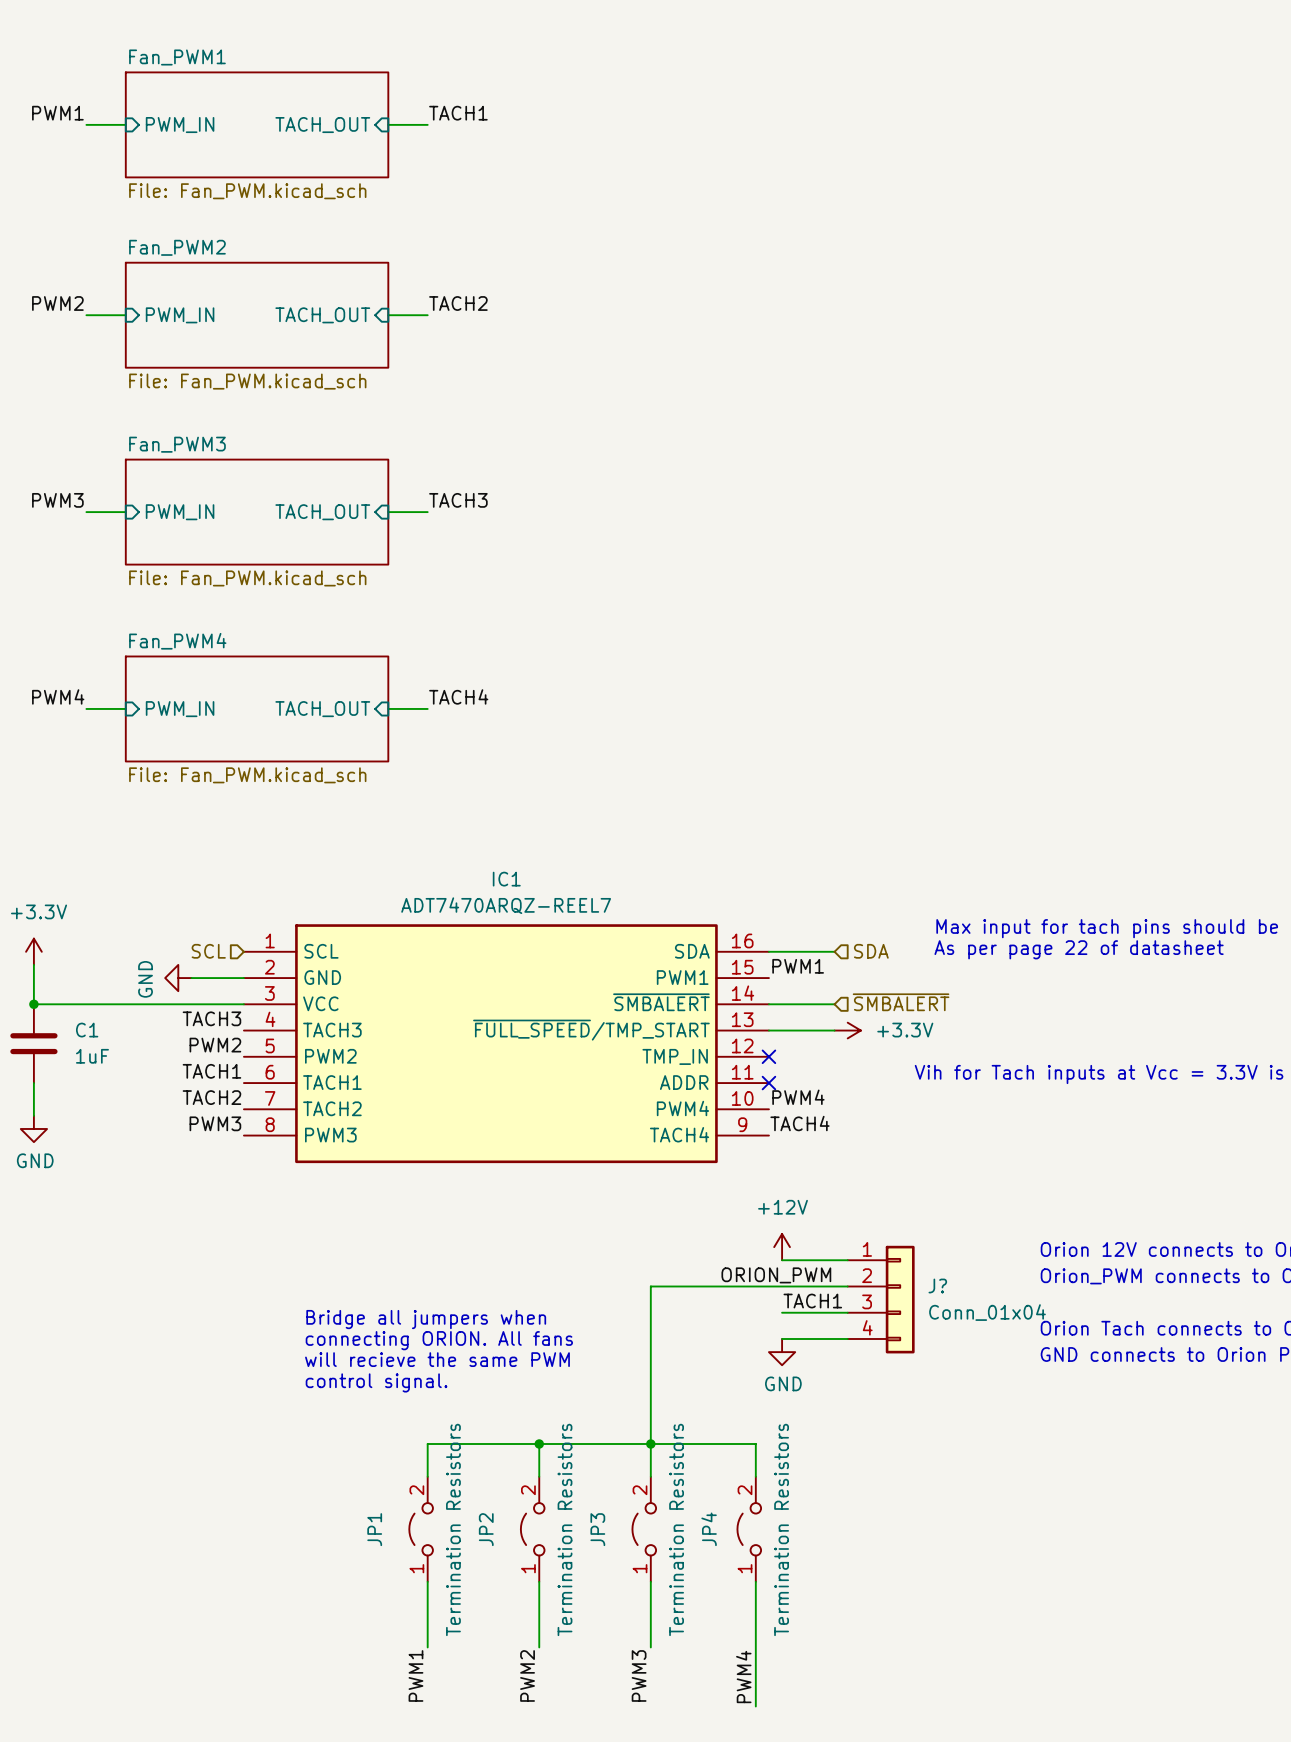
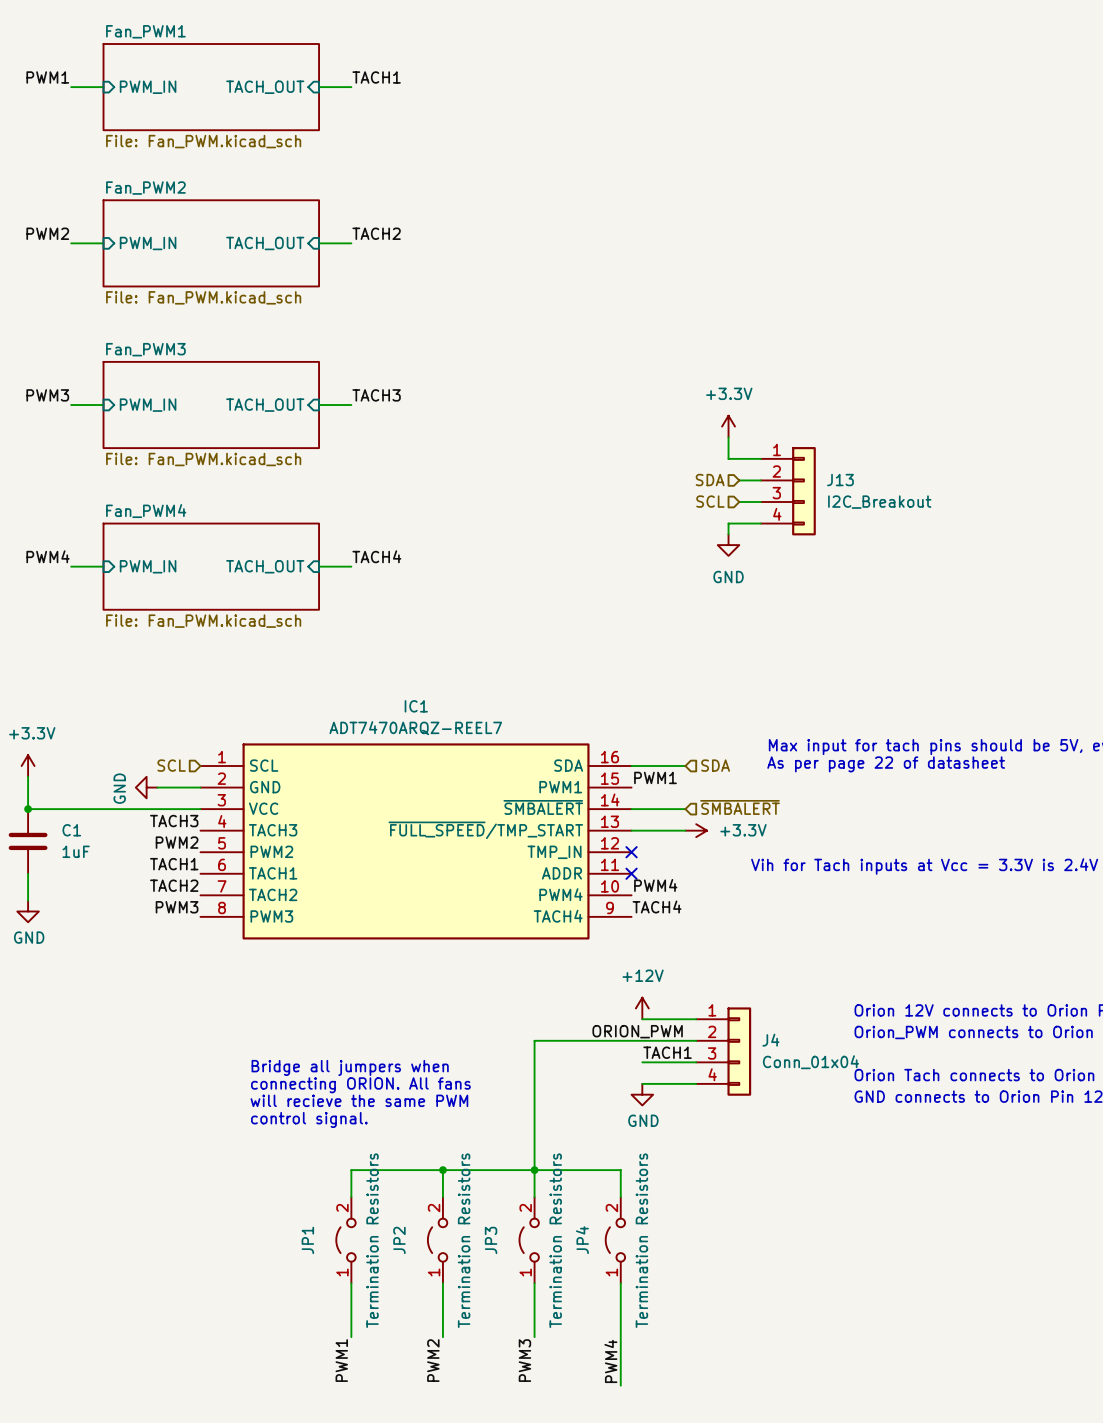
power symbol: none -> +3.3V (728, 426)
wire: none -> (728, 437) (728, 458) (760, 458)
hierarchical label: none -> SDA (710, 480)
wire: none -> (739, 480) (760, 480)
J13: none -> I2C_Breakout (788, 491)
hierarchical label: none -> SCL (710, 501)
wire: none -> (739, 501) (760, 501)
wire: none -> (760, 523) (728, 523) (728, 534)
power symbol: none -> GND (728, 545)
J? name: J? (937, 1286) -> J4 (770, 1040)

